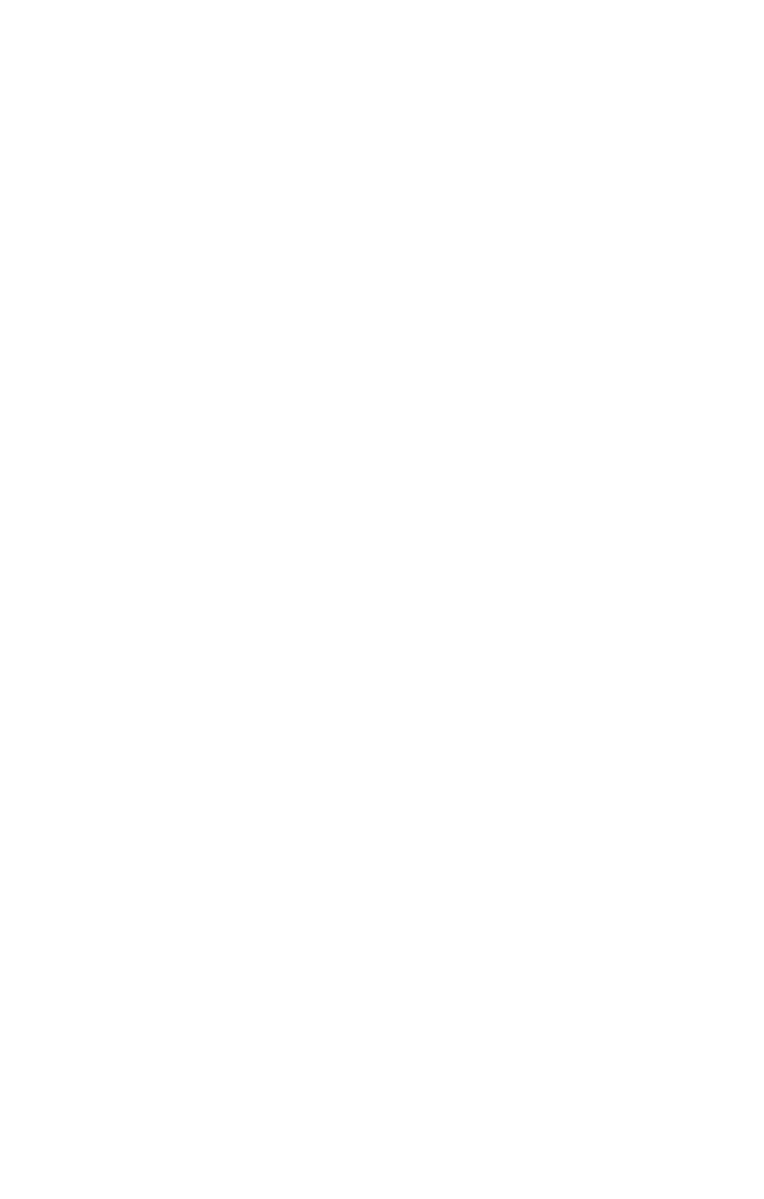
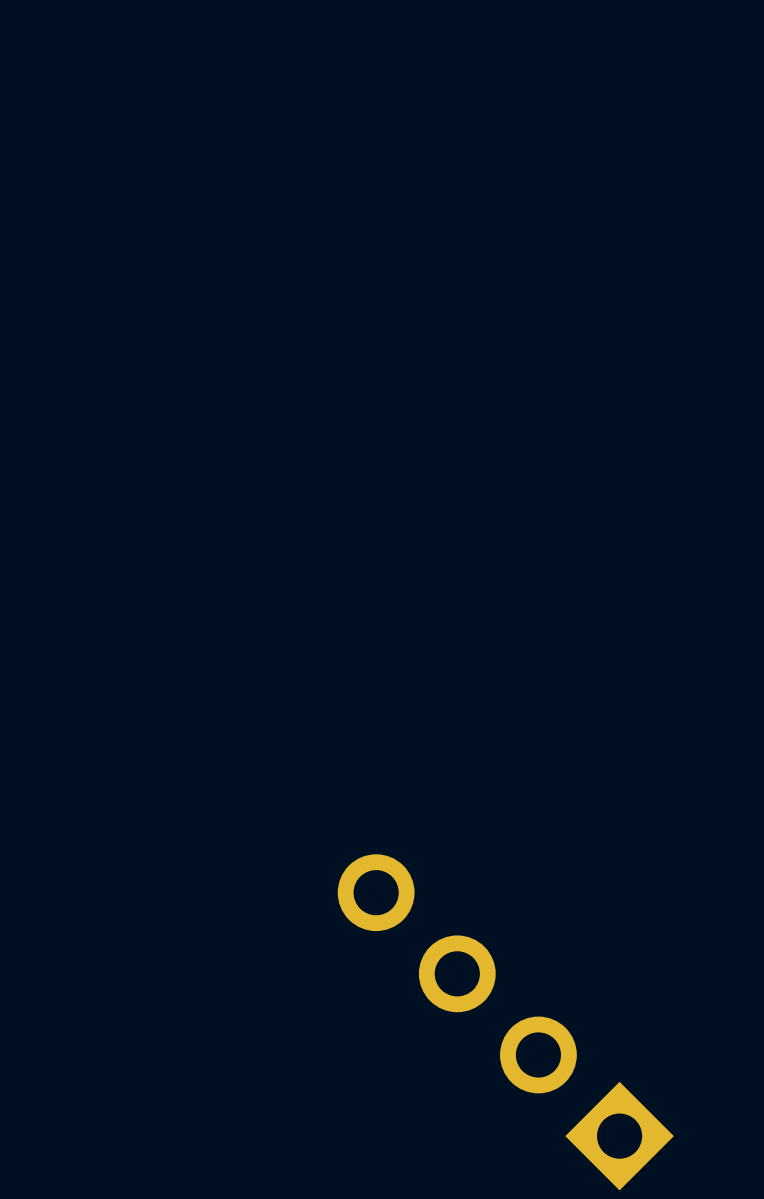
part: none -> (505, 1022)

